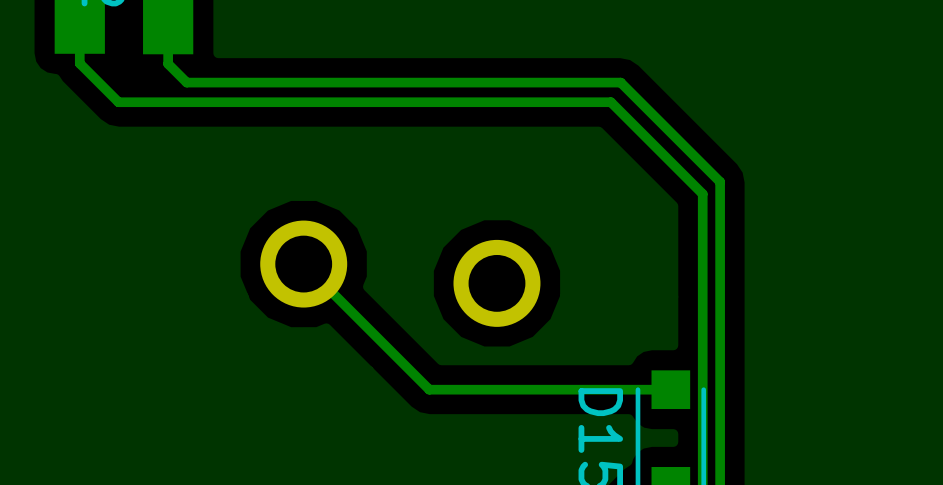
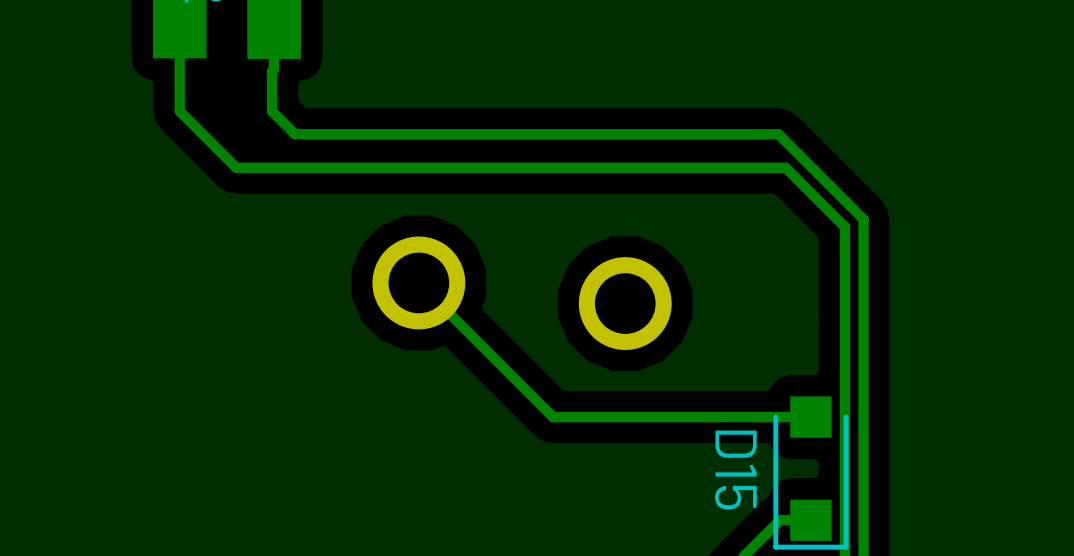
track: (79, 63) (118, 102) (610, 102) (702, 194) (702, 211) -> (179, 68) (179, 111) (236, 167) (785, 167) (844, 226)
track: (168, 63) (186, 82) (620, 82) (720, 181) (720, 204) -> (274, 69) (272, 71) (272, 111) (295, 134) (778, 134) (863, 219)

